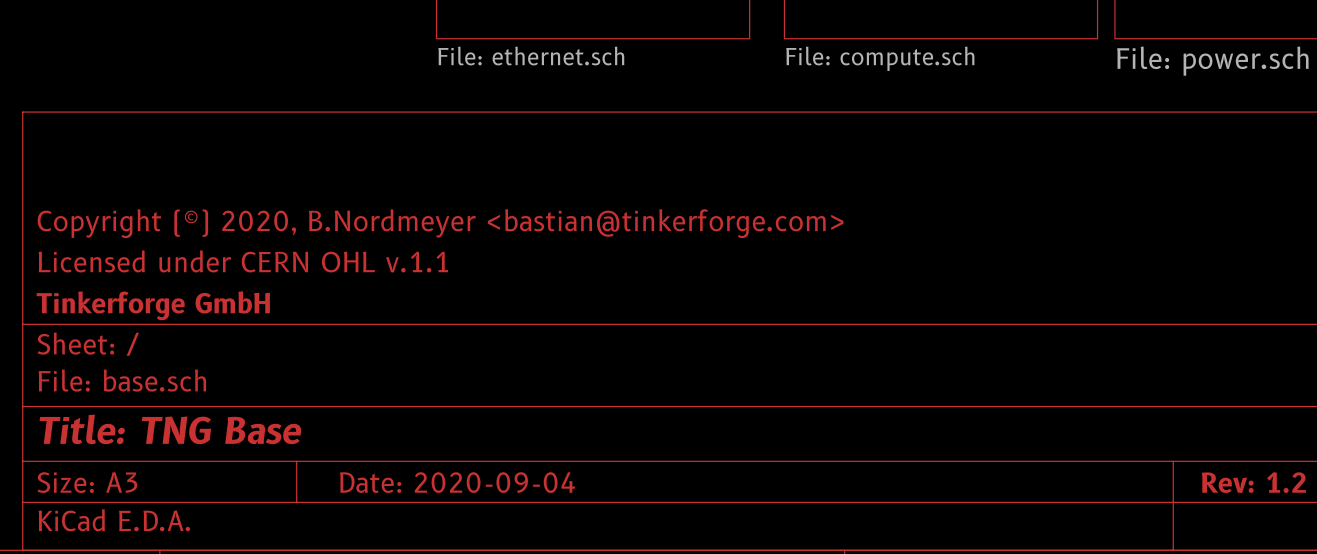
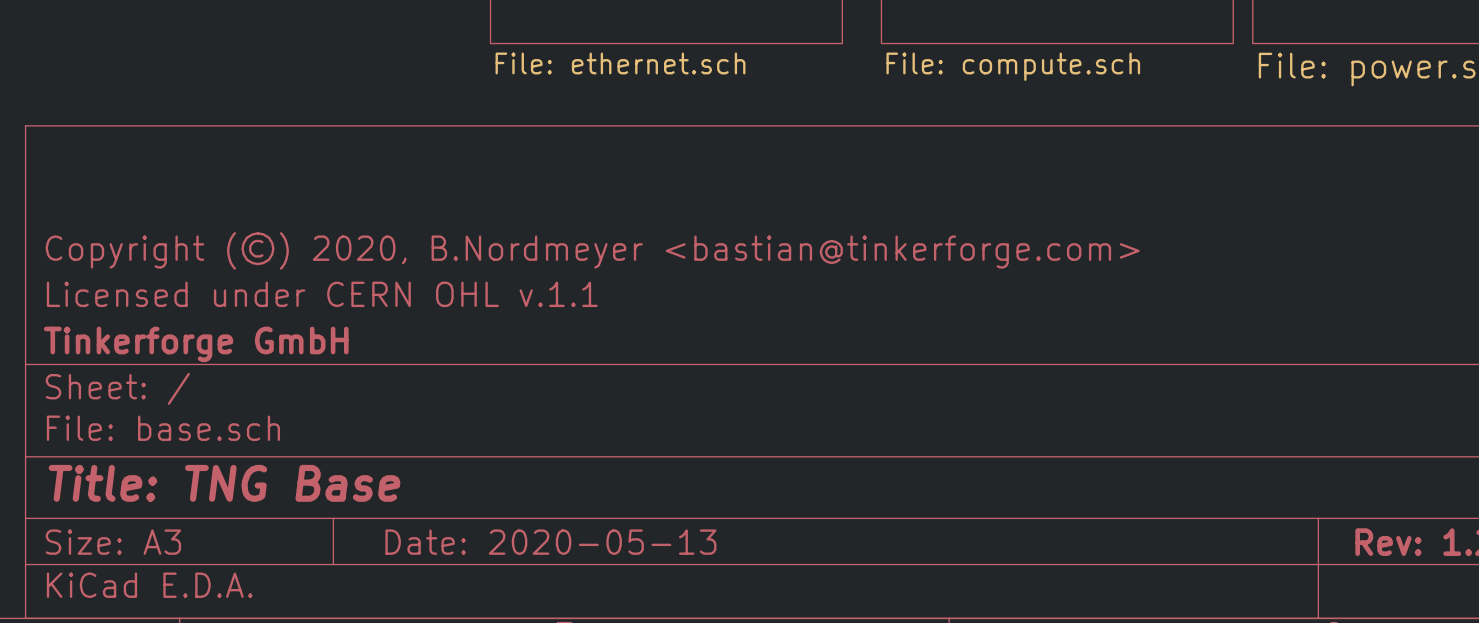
title block: Date: 2020-09-04 (457, 482) -> Date: 2020-05-13 (550, 542)

